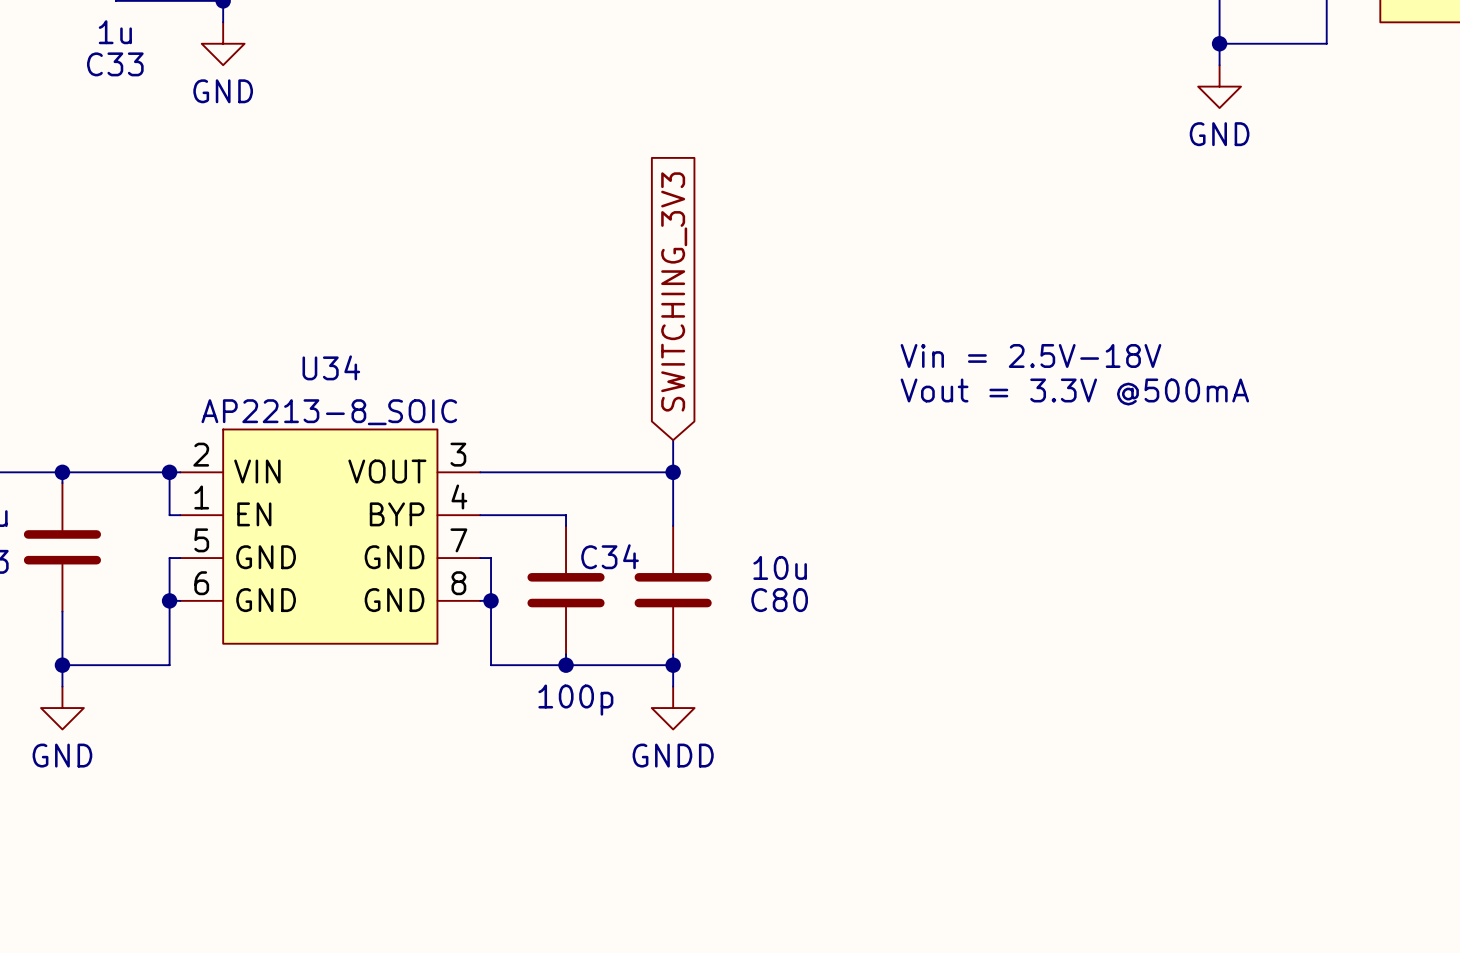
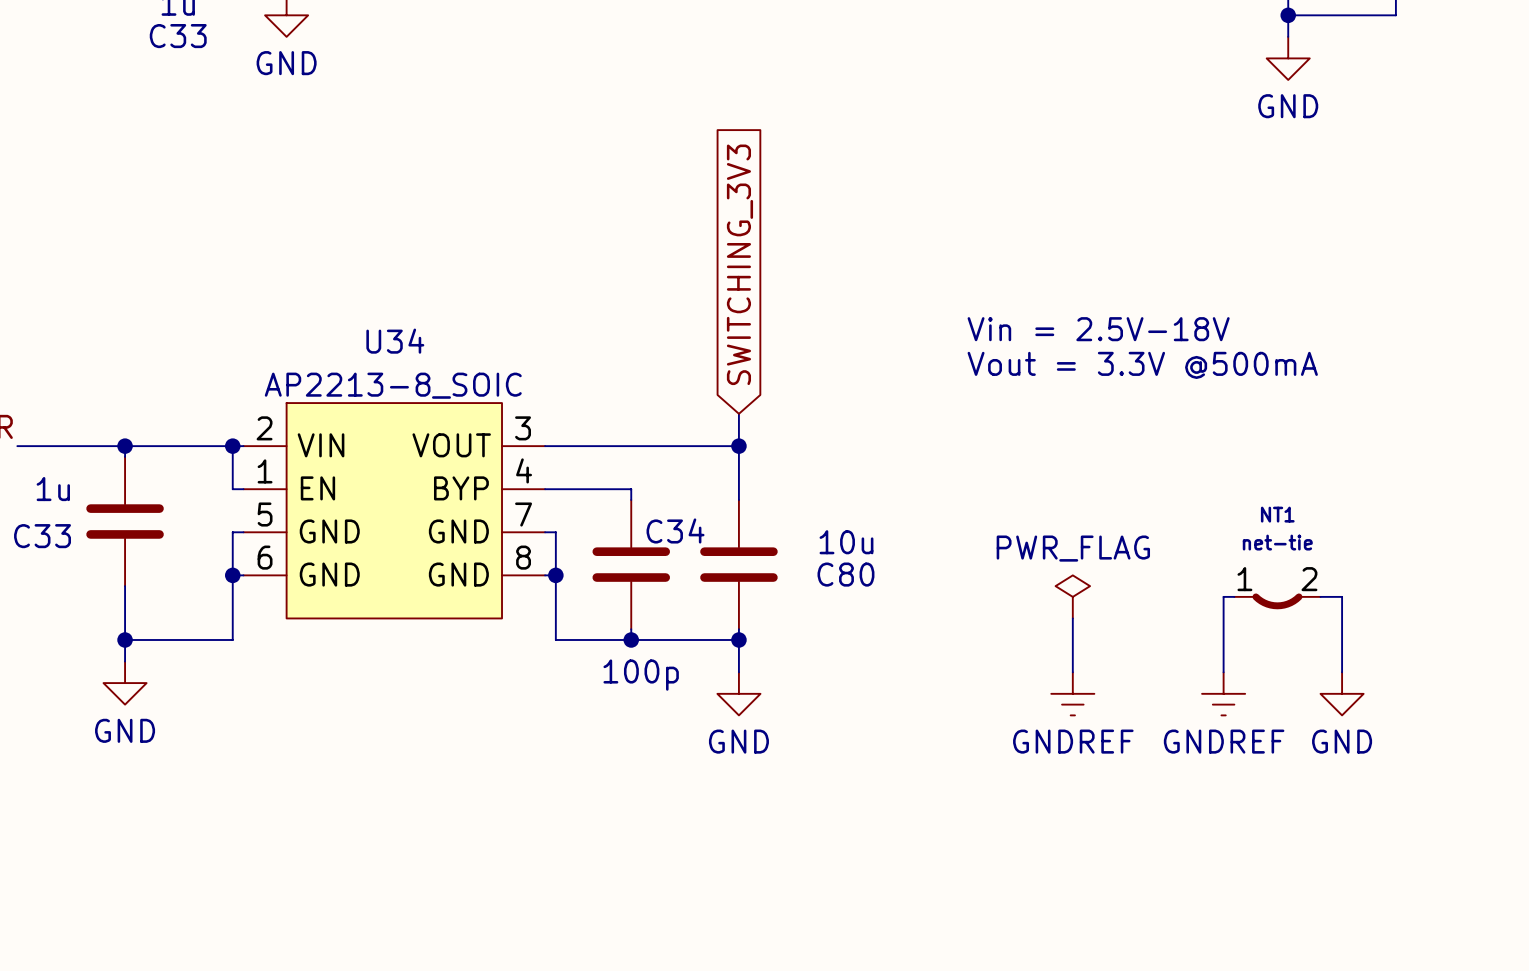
power symbol: none -> PWR_FLAG (1072, 596)
wire: none -> (1234, 596) (1223, 596) (1223, 672)
wire: none -> (1320, 596) (1342, 596) (1342, 672)
NT1: none -> net-tie (1277, 601)
wire: none -> (1072, 618) (1072, 672)
power symbol: GNDD (673, 708) -> GND (738, 693)
power symbol: none -> GNDREF (1072, 693)
power symbol: none -> GNDREF (1223, 693)
power symbol: none -> GND (1342, 693)

